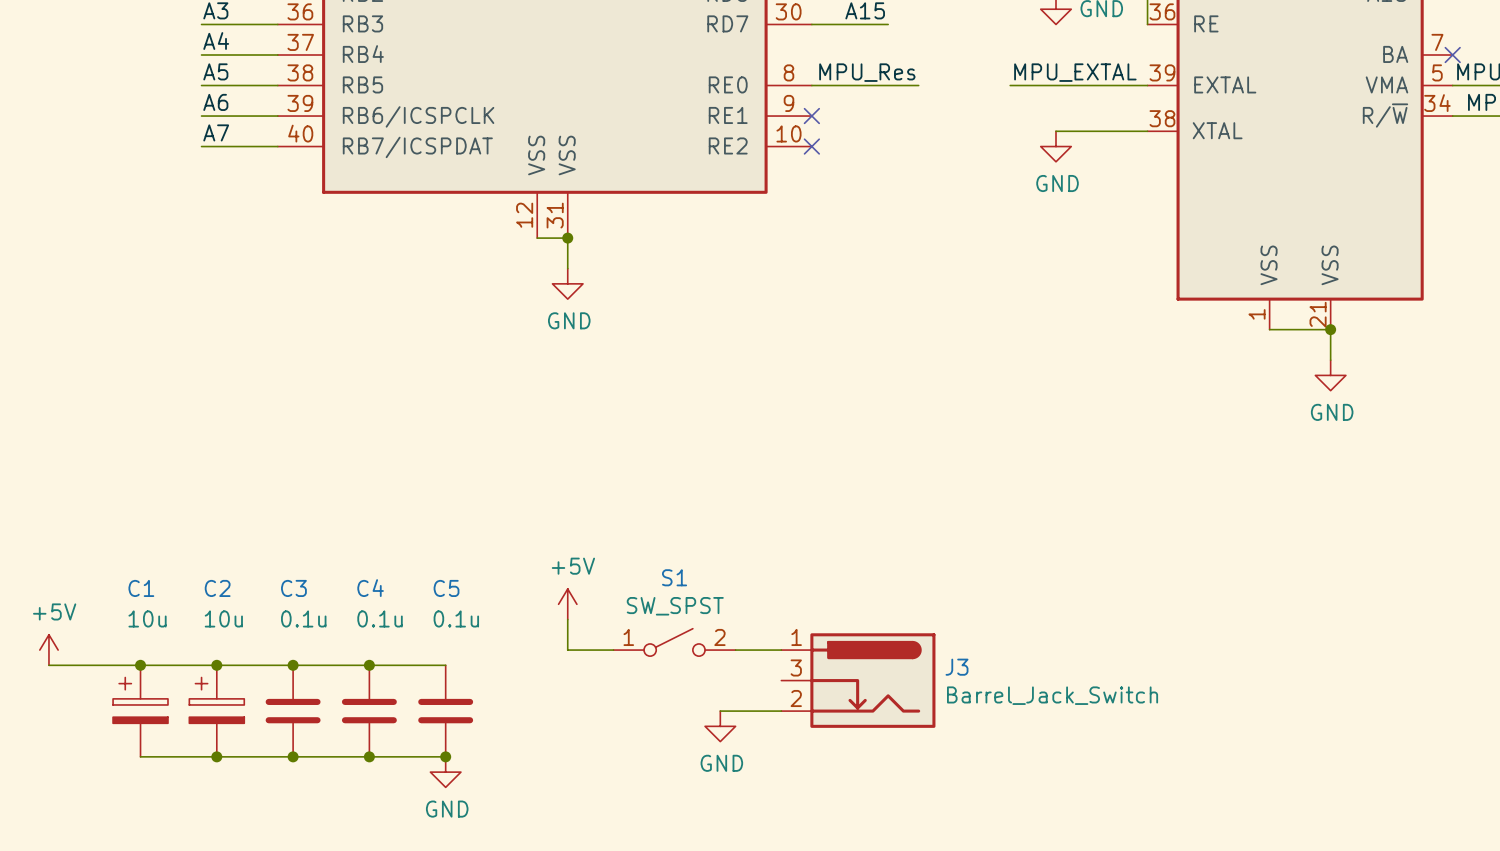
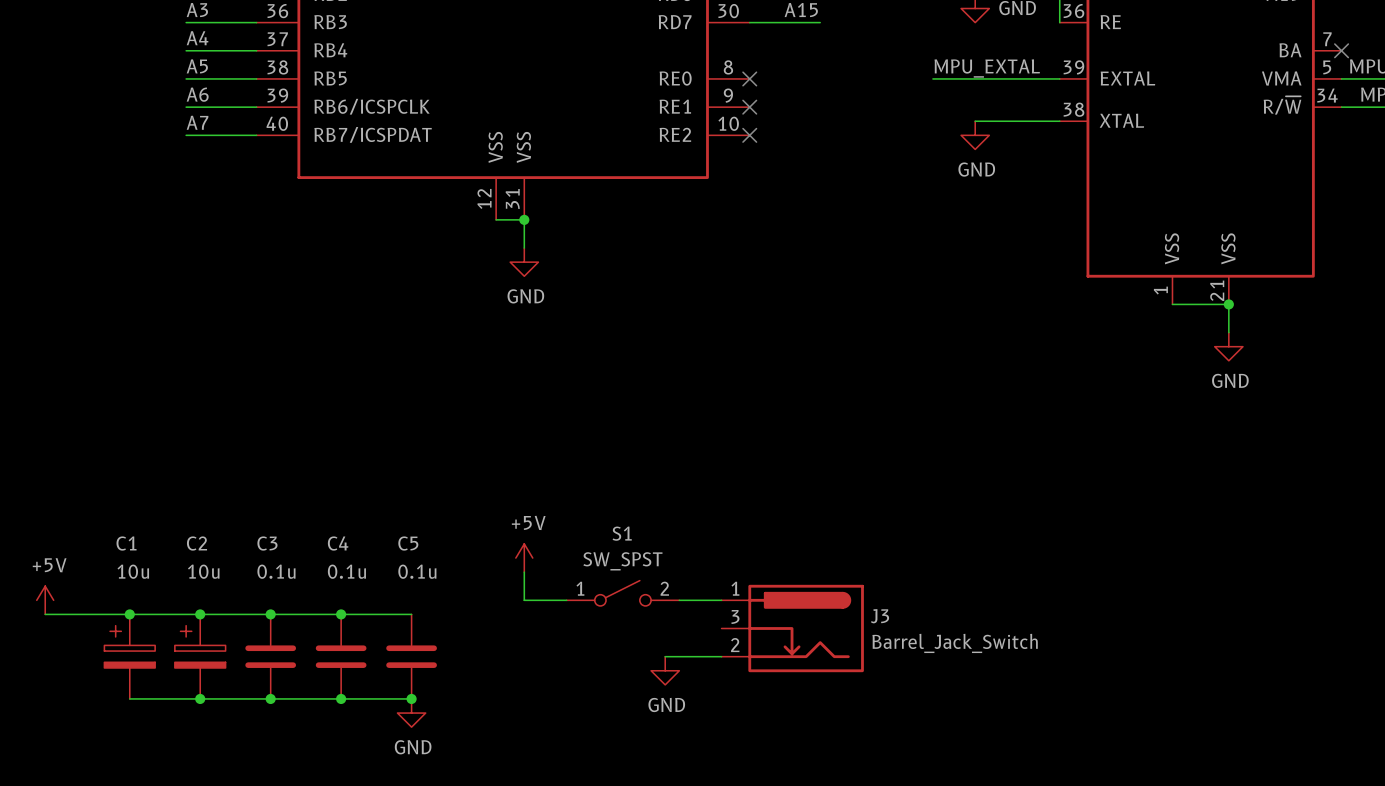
label: MPU_Res (867, 72) -> none
wire: (811, 85) (918, 85) -> none
no-connect mark: none -> (749, 78)

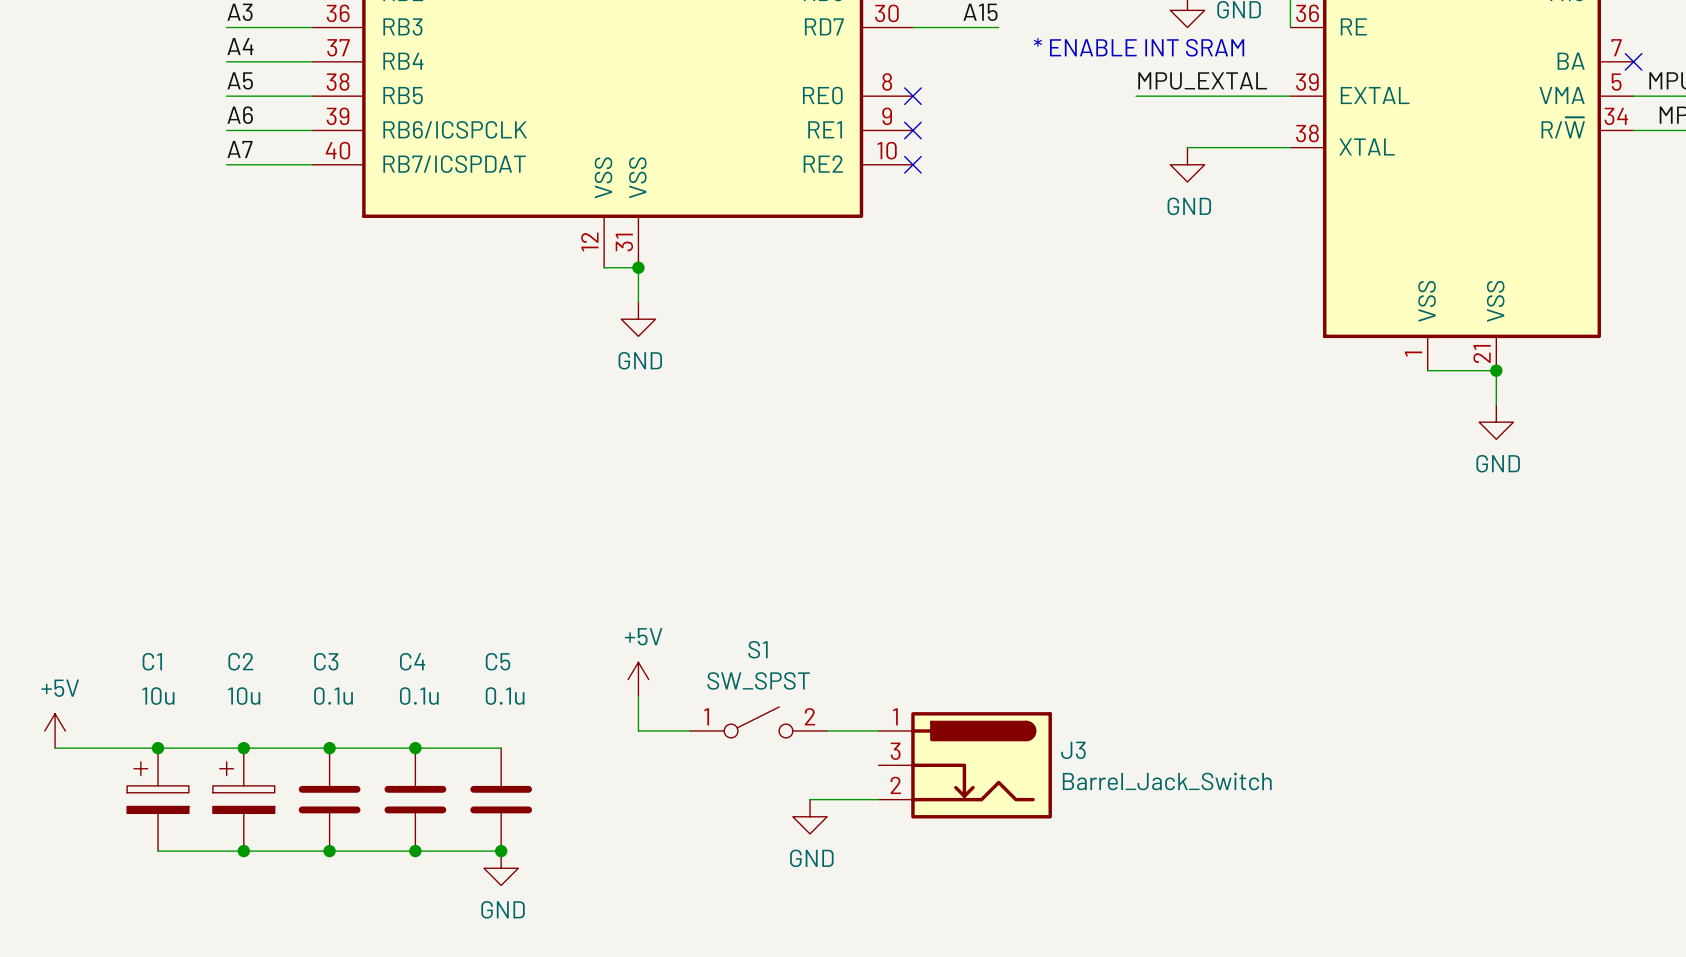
text: none -> * ENABLE INT SRAM (1139, 47)

